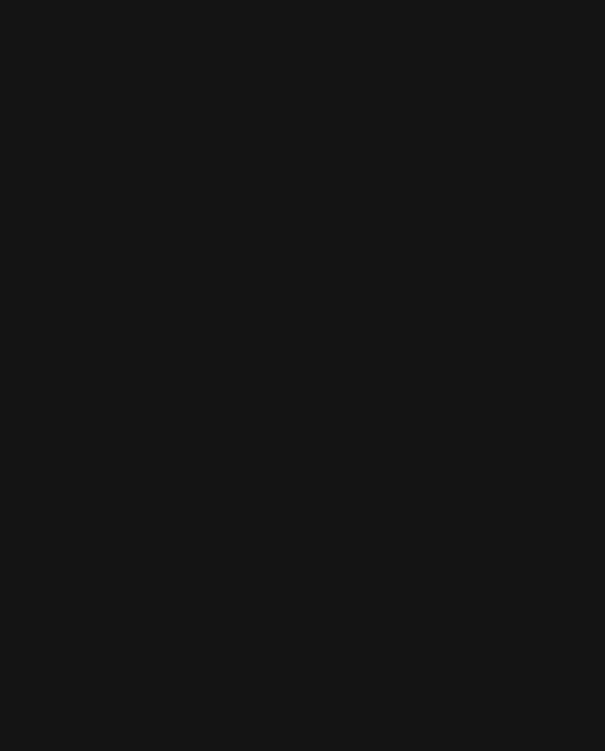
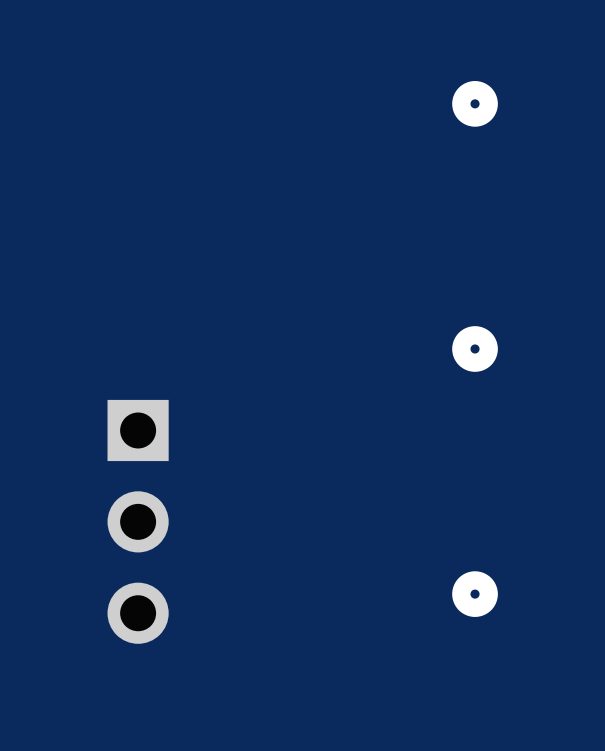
part: none -> (475, 103)
part: none -> (475, 348)
part: none -> (138, 521)
part: none -> (475, 594)

